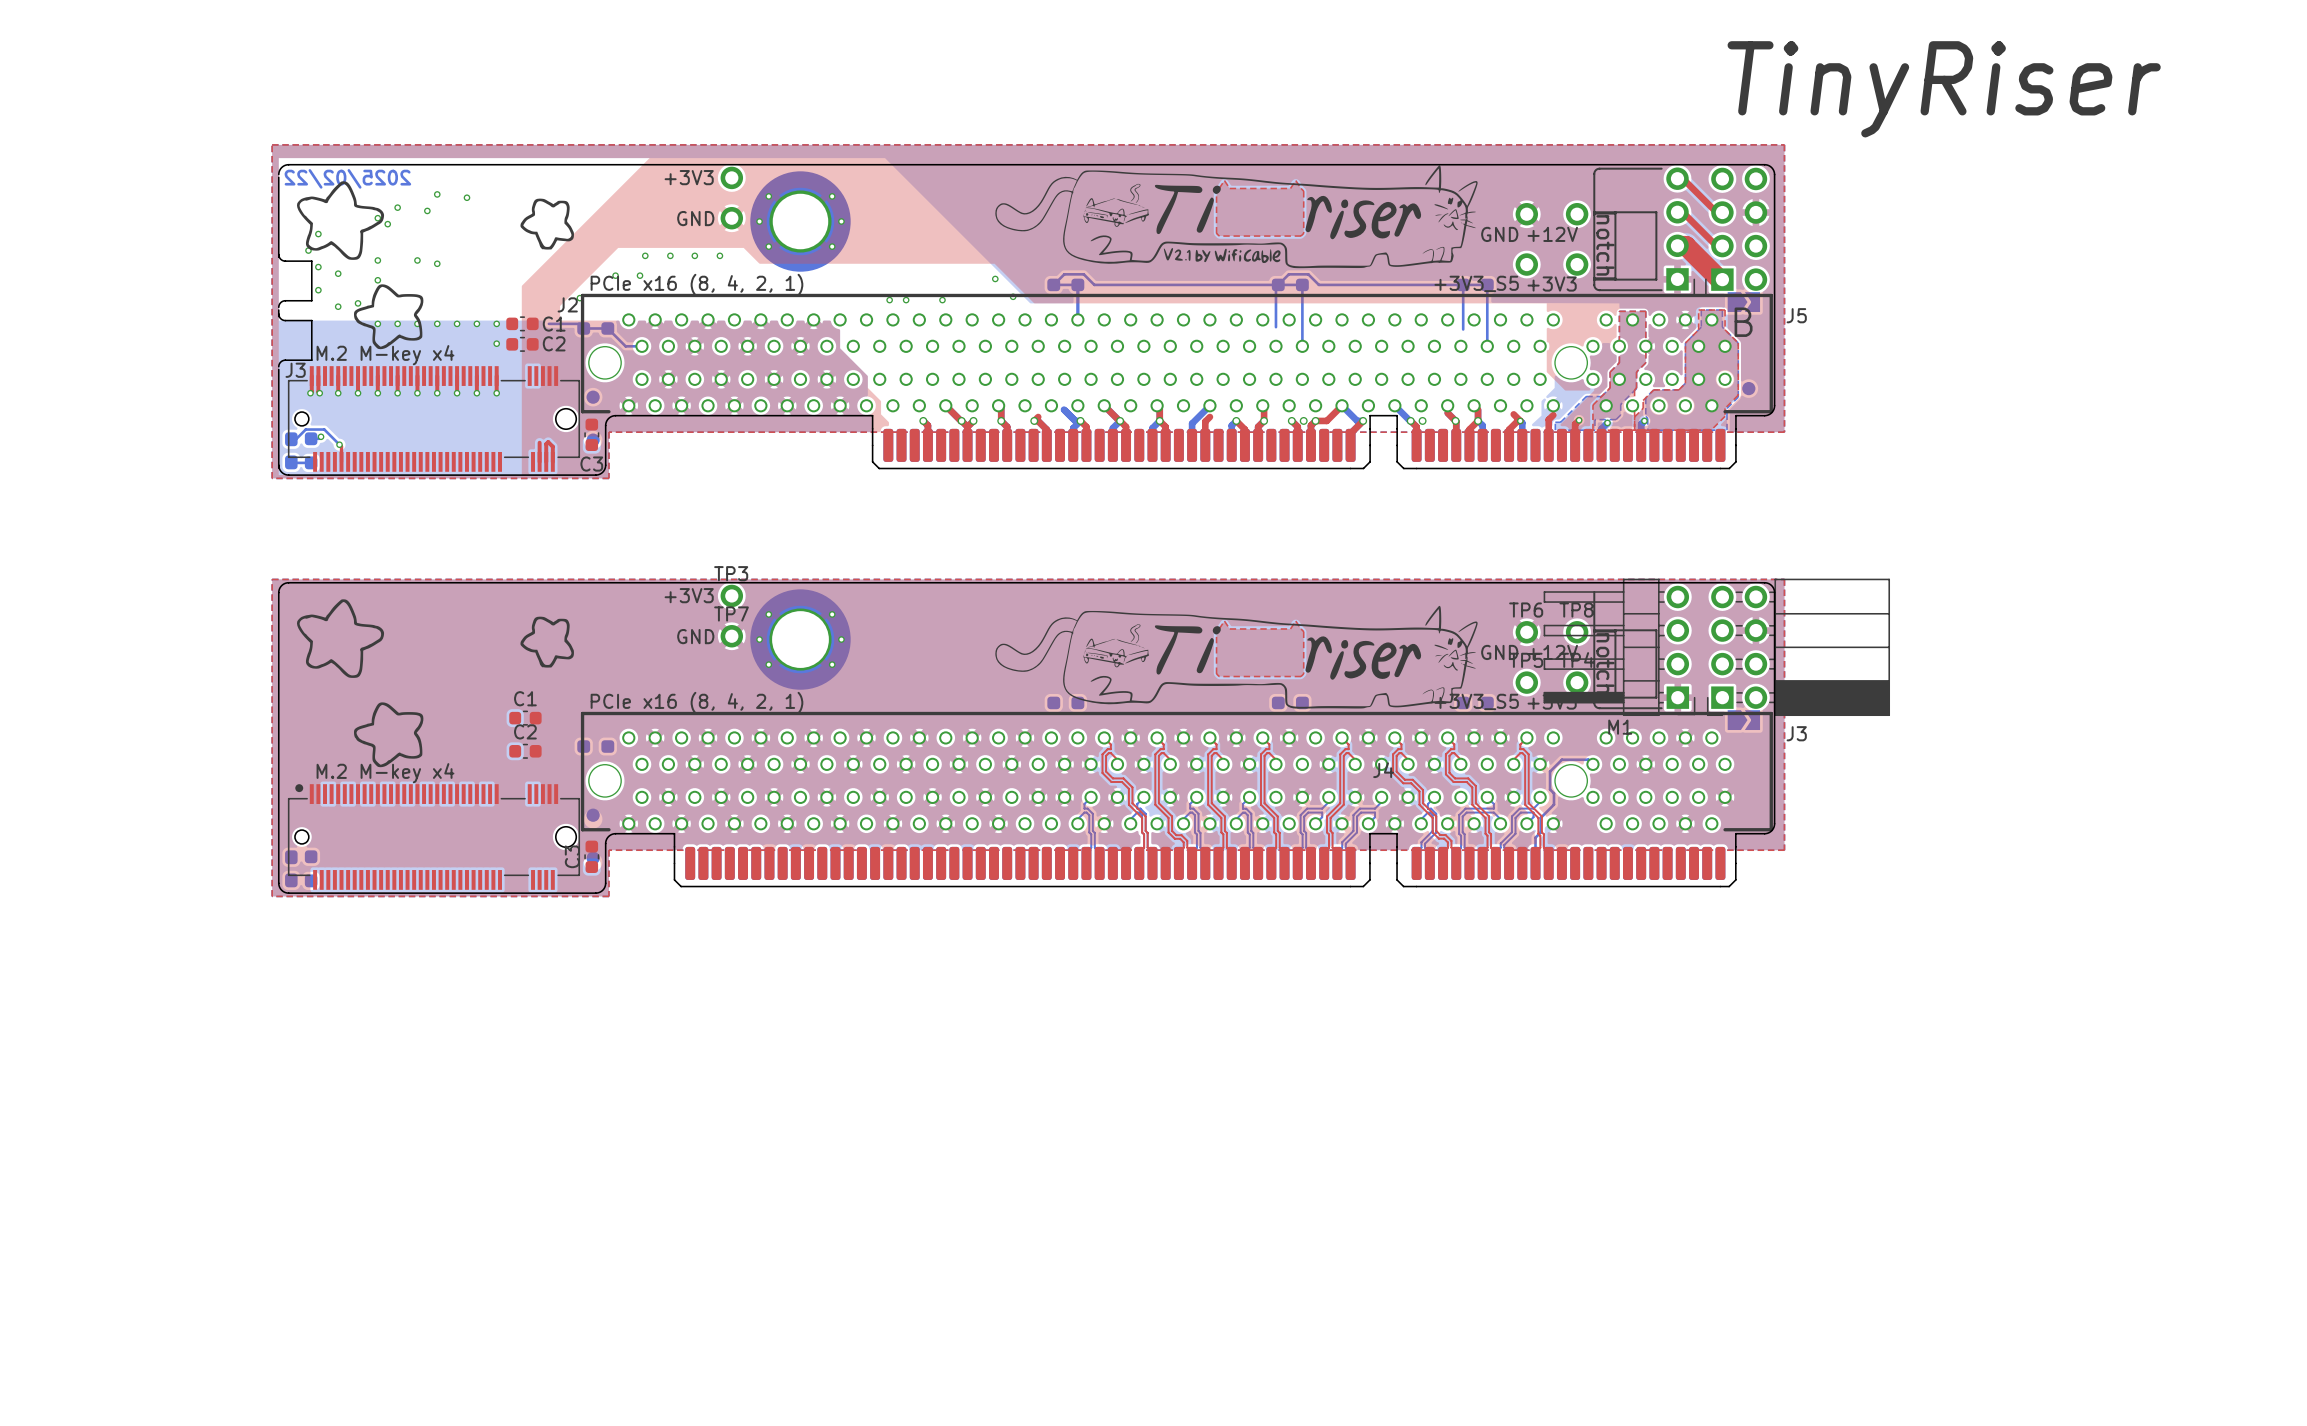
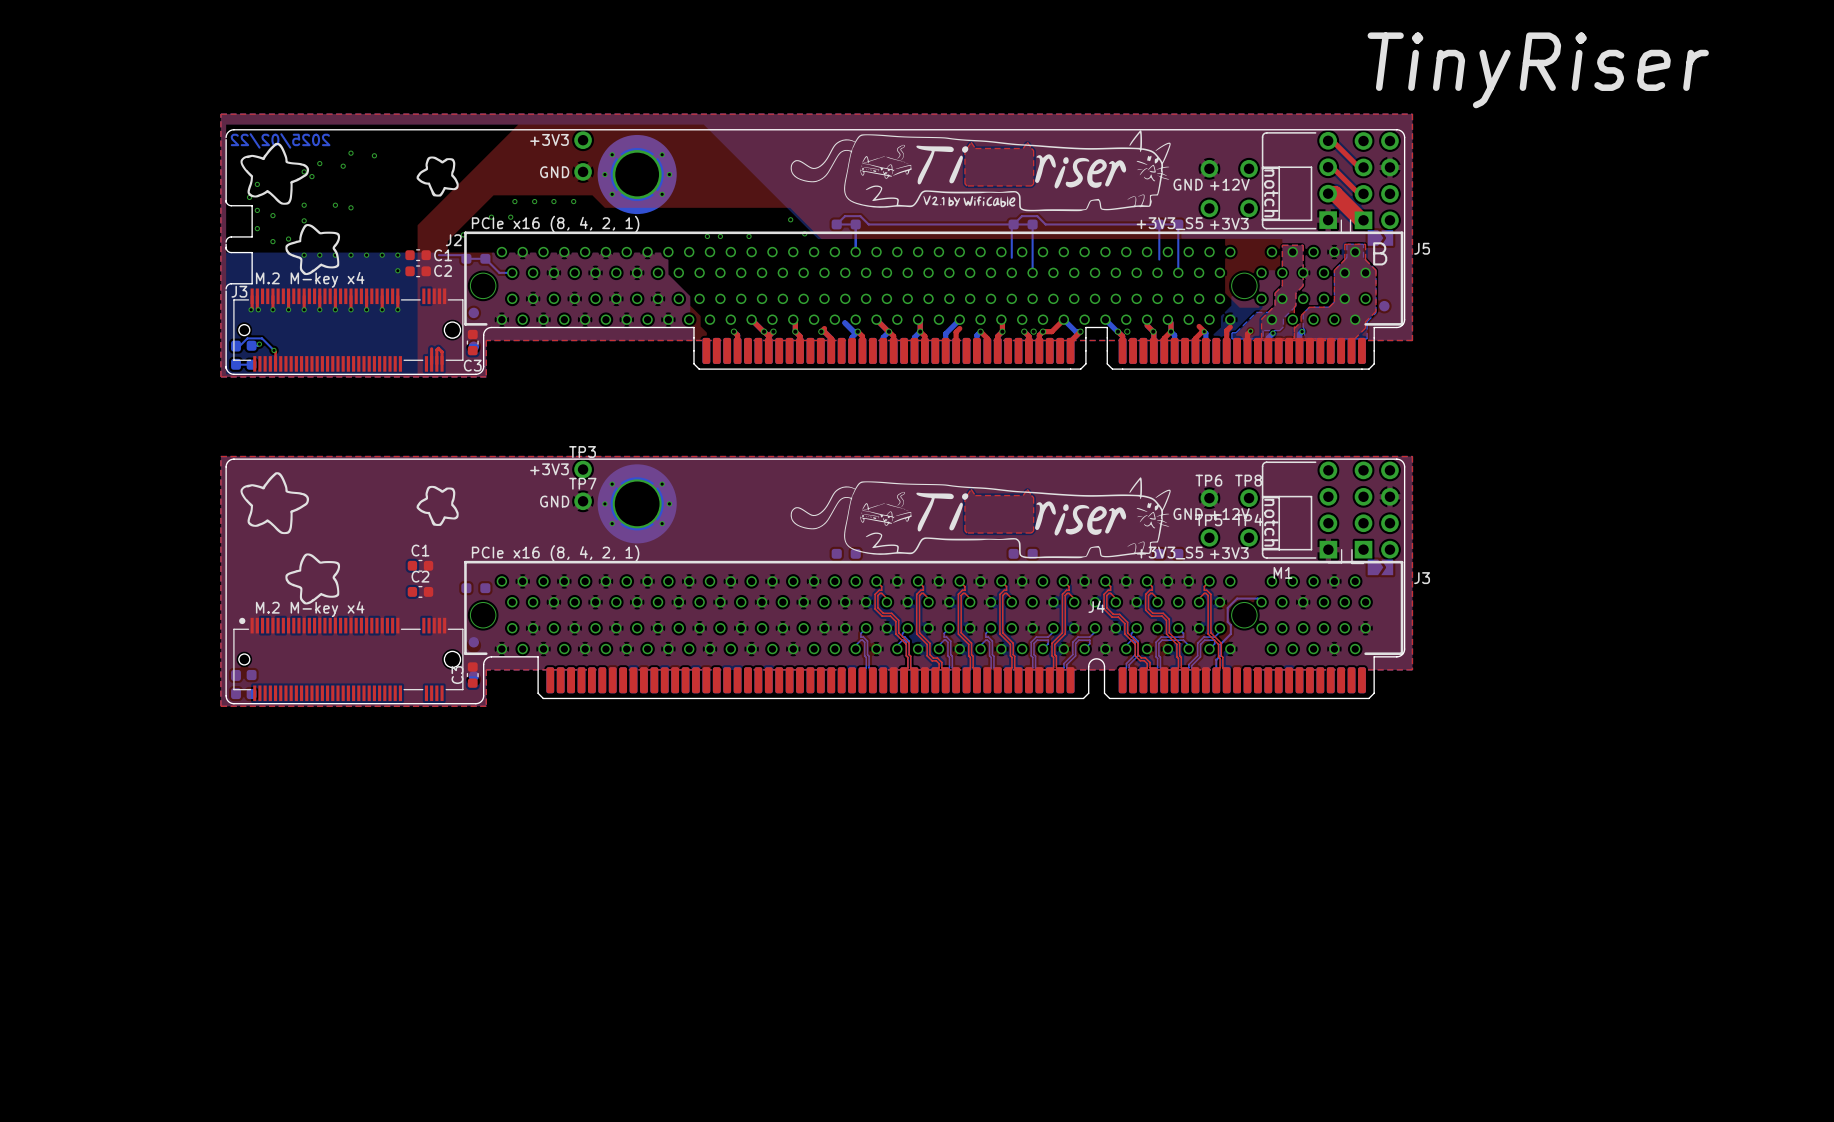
M1 footprint: [1543, 578, 1696, 717] -> [1319, 461, 1343, 564]
line: none -> (1315, 462) (1266, 462) (1262, 466)
J3: (1798, 647) -> none
J3: none -> (1375, 512)
J4 footprint: [673, 833, 1737, 888] -> [537, 656, 1375, 699]

